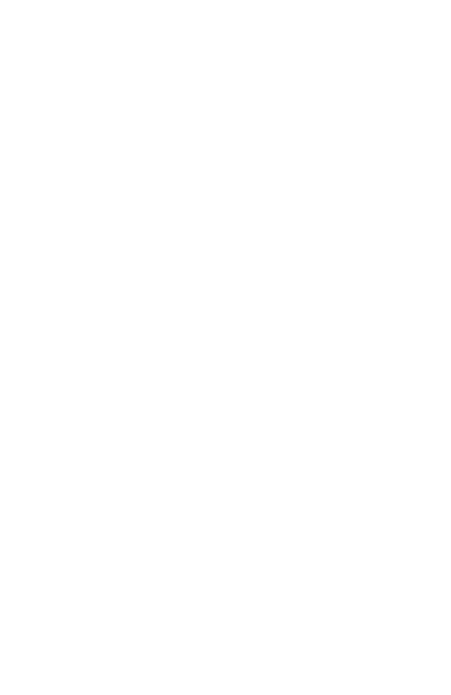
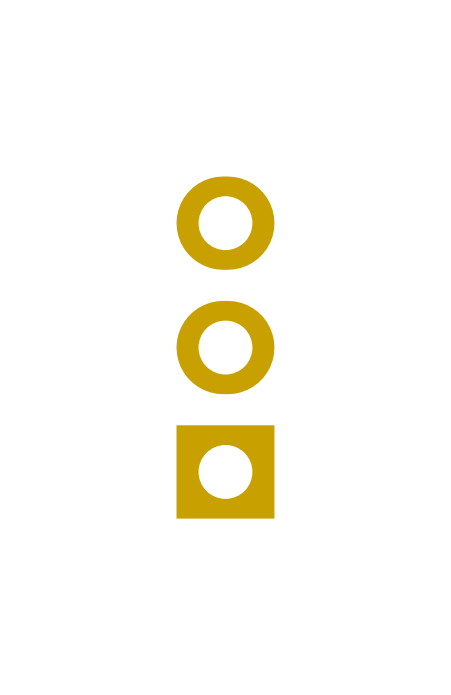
part: none -> (225, 347)

